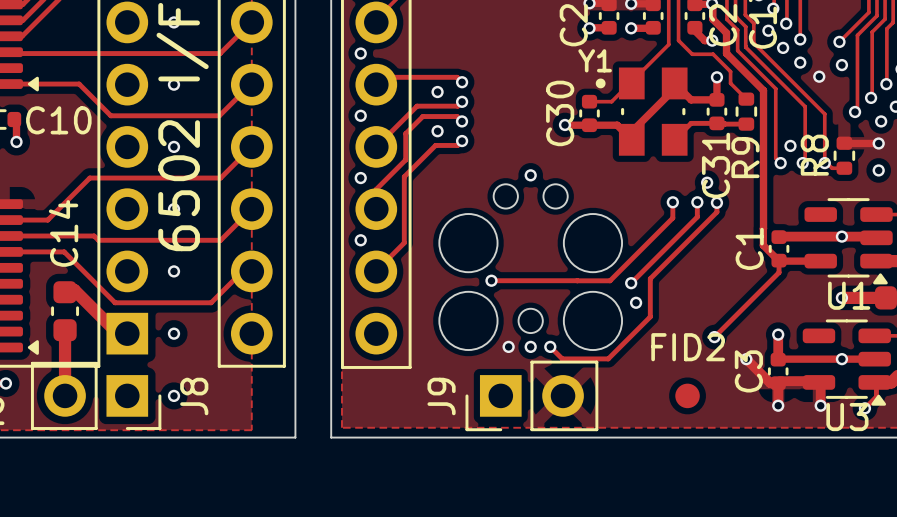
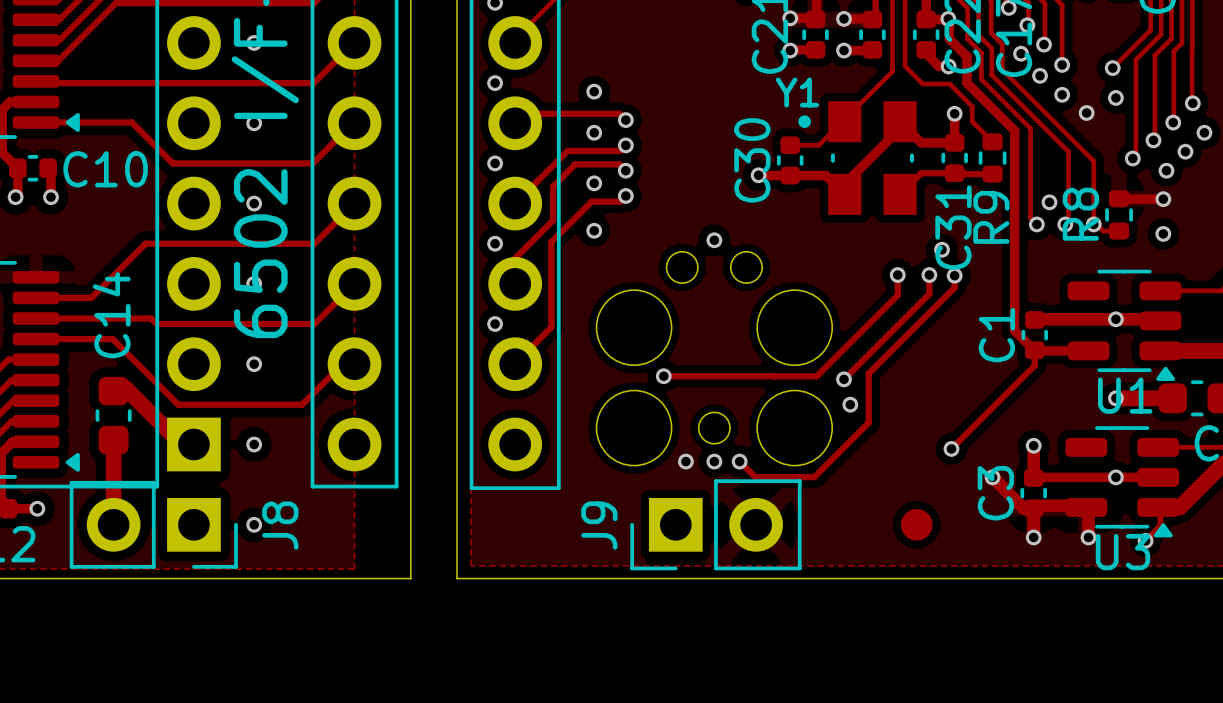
via: none -> (594, 91)
via: none -> (594, 230)
FID2 name: FID2 (688, 347) -> none

